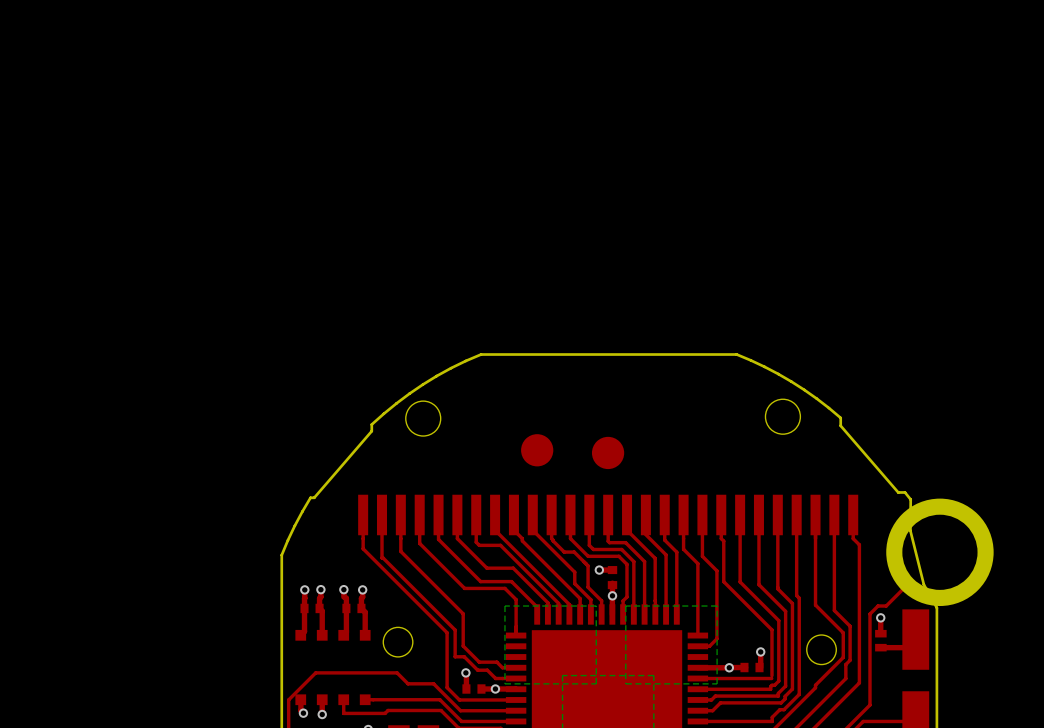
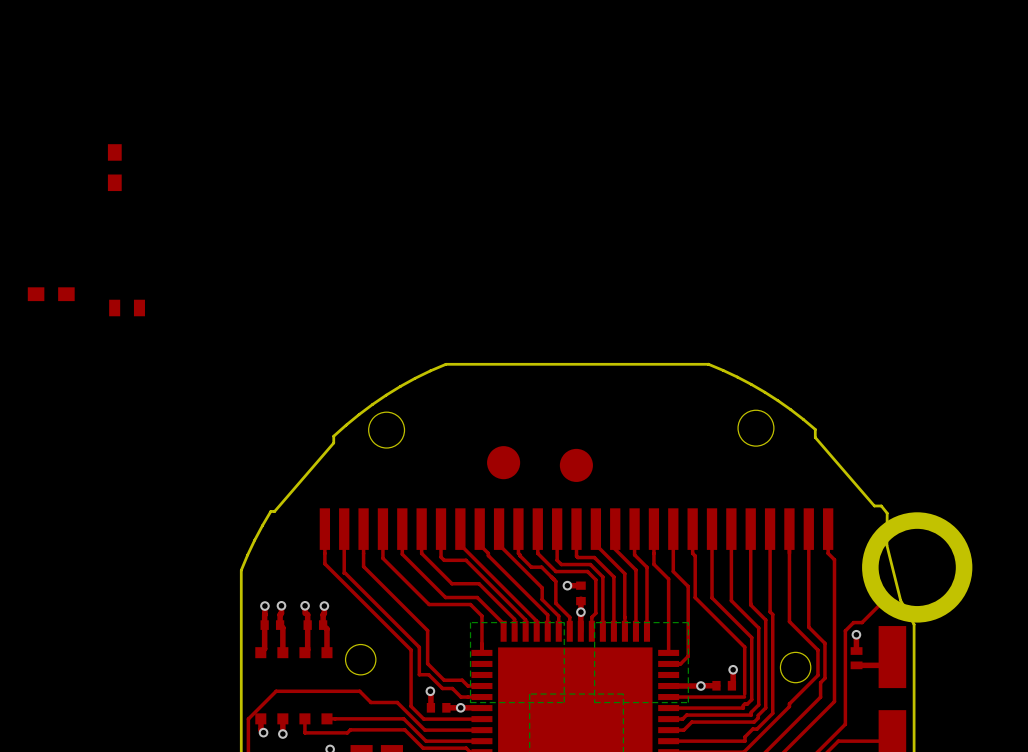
part: none -> (114, 167)
part: none -> (51, 294)
part: none -> (127, 307)

